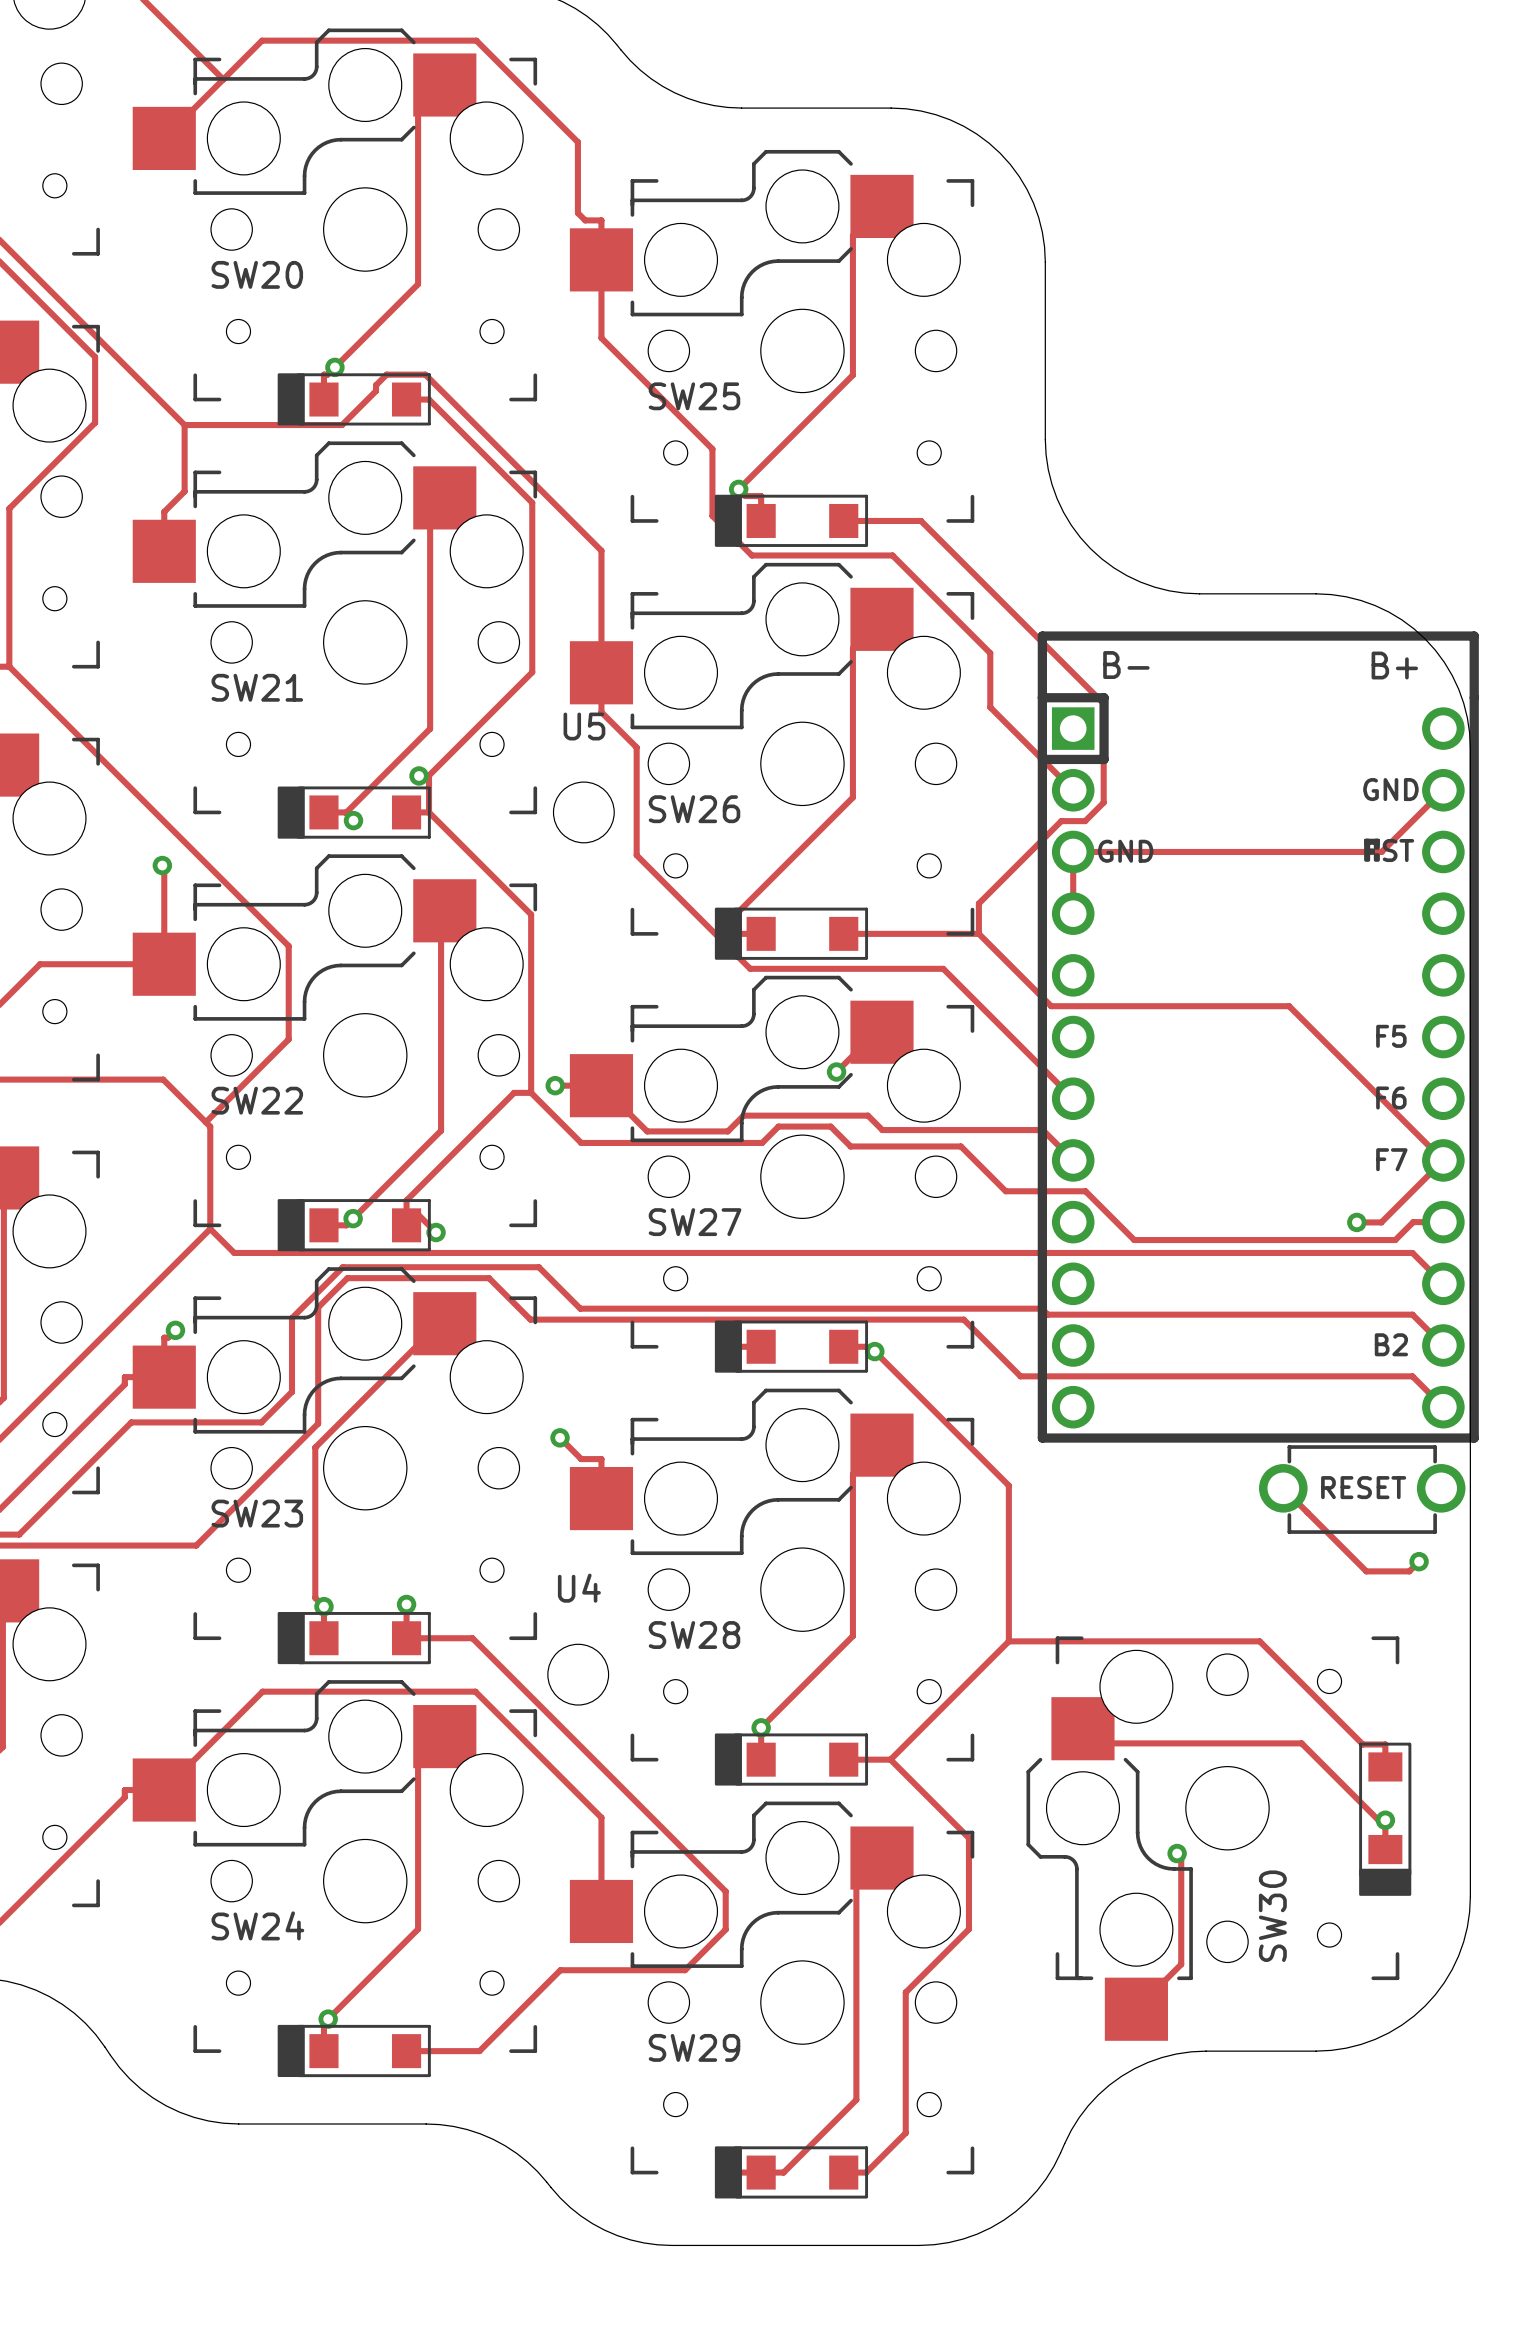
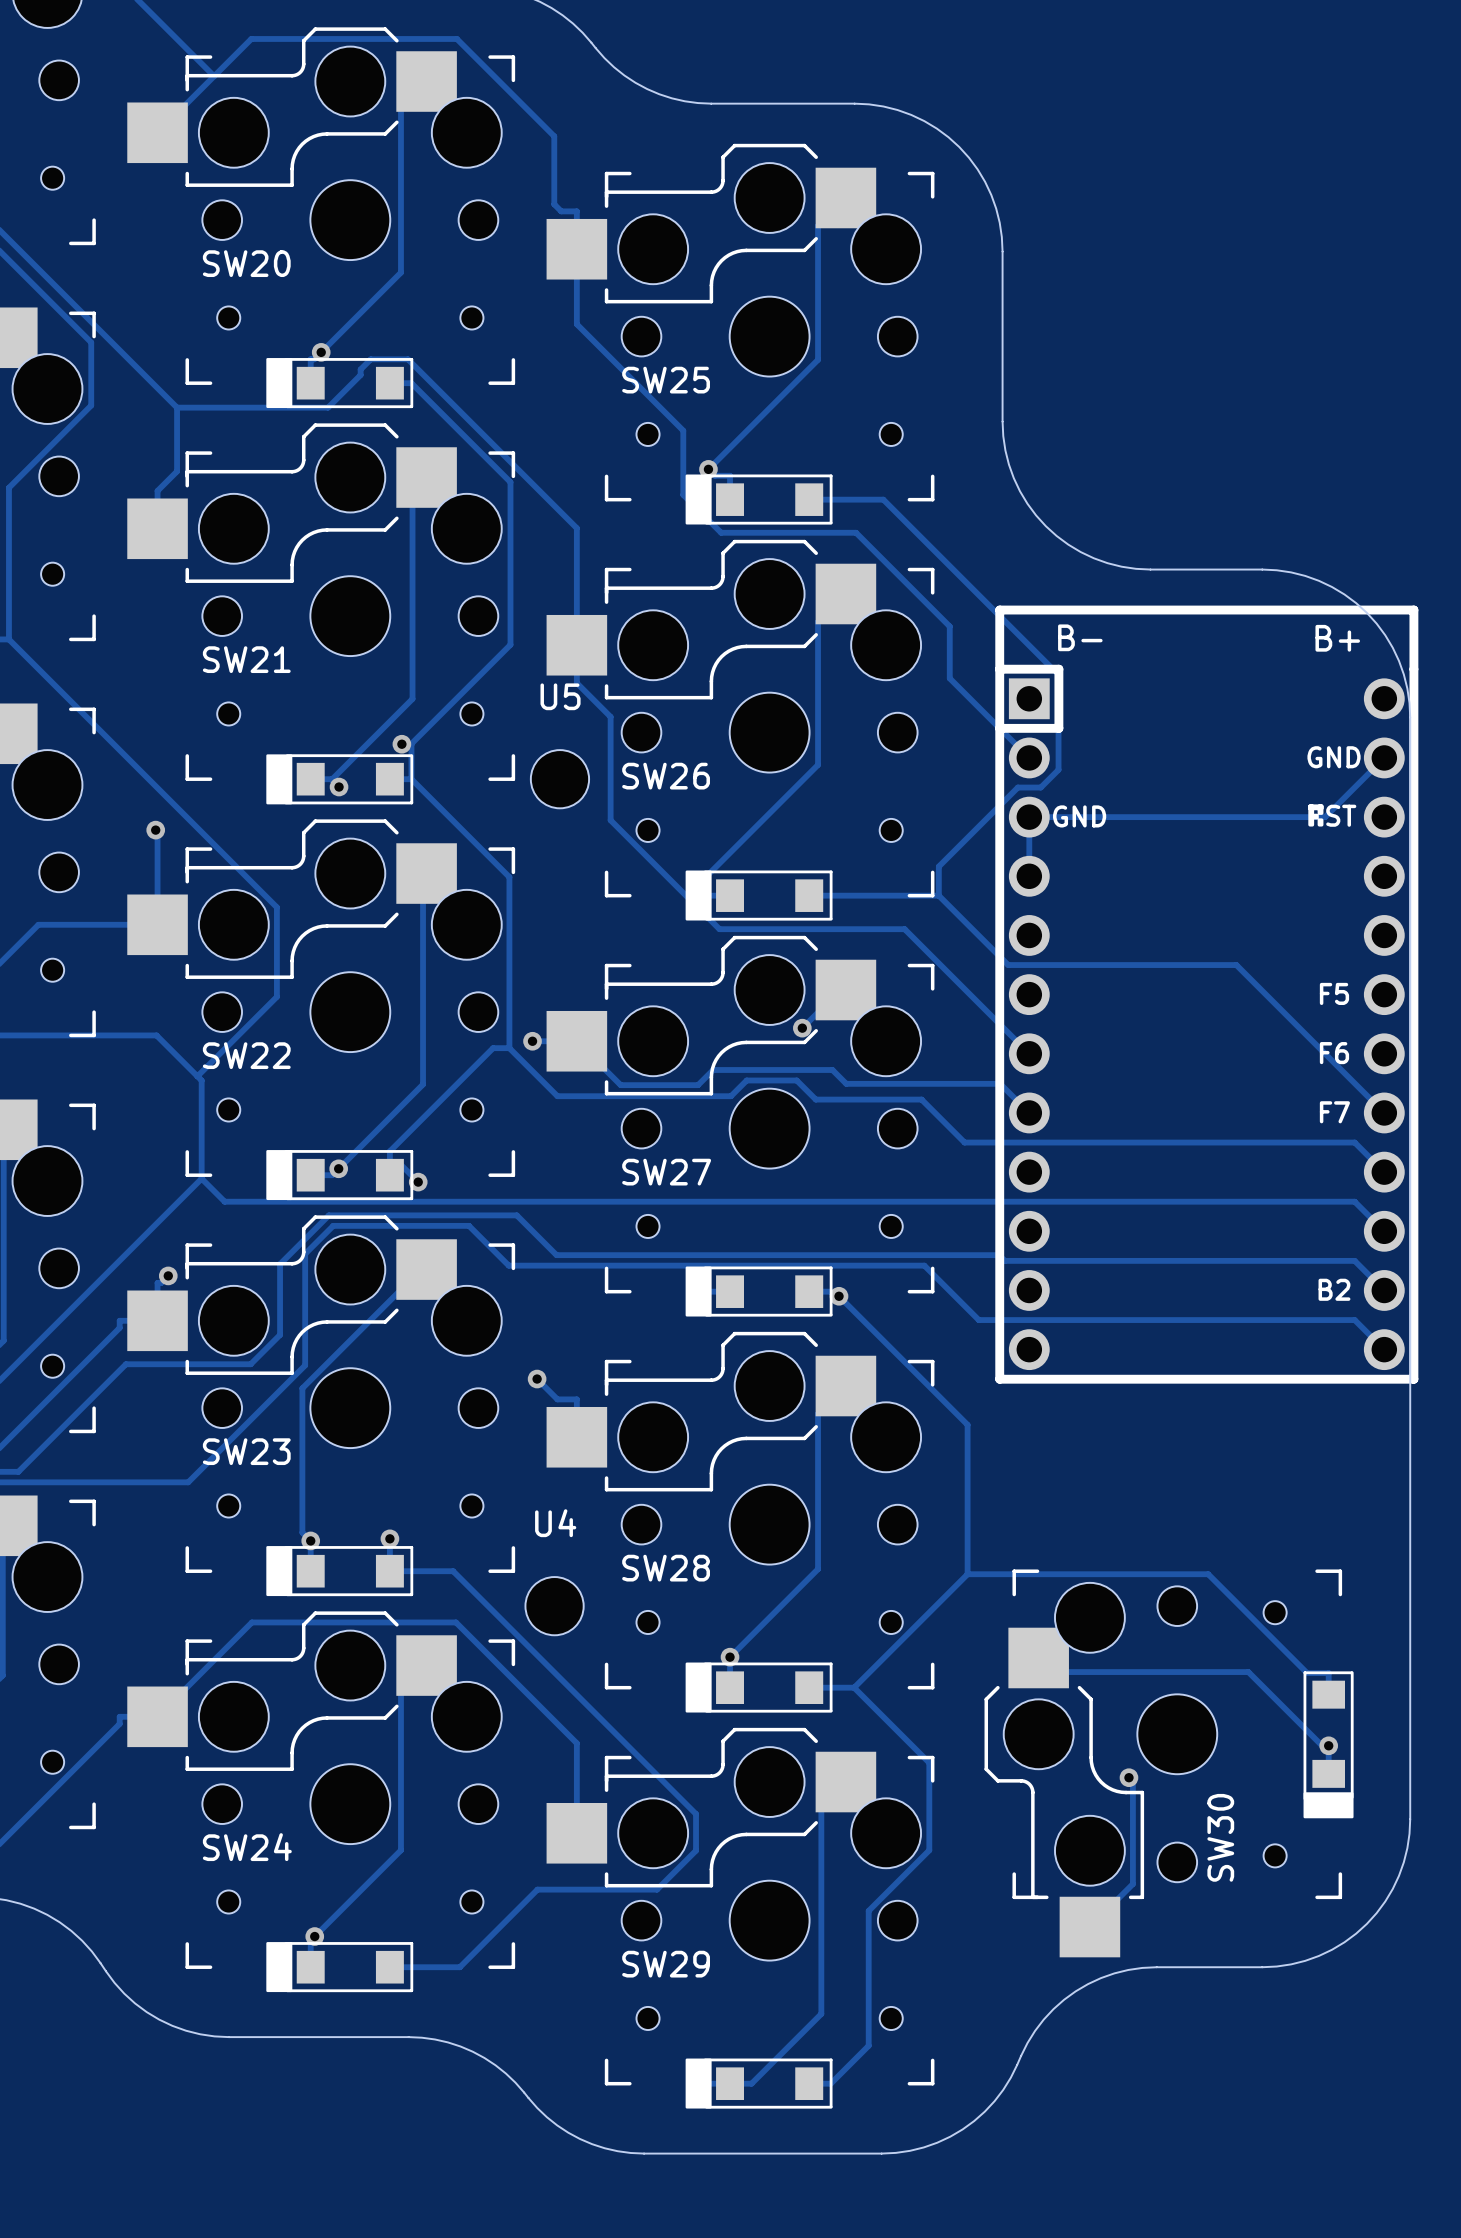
track: (1443, 1160) (1381, 1222) (1356, 1222) -> none
track: (1085, 1191) (1134, 1240) (1395, 1240) (1413, 1222) (1443, 1222) -> (1041, 1142) (1354, 1142) (1384, 1172)
via: (1356, 1222) -> none
track: (1283, 1488) (1366, 1571) (1409, 1571) (1419, 1561) -> none
part: (1362, 1489) -> none
via: (1419, 1561) -> none

